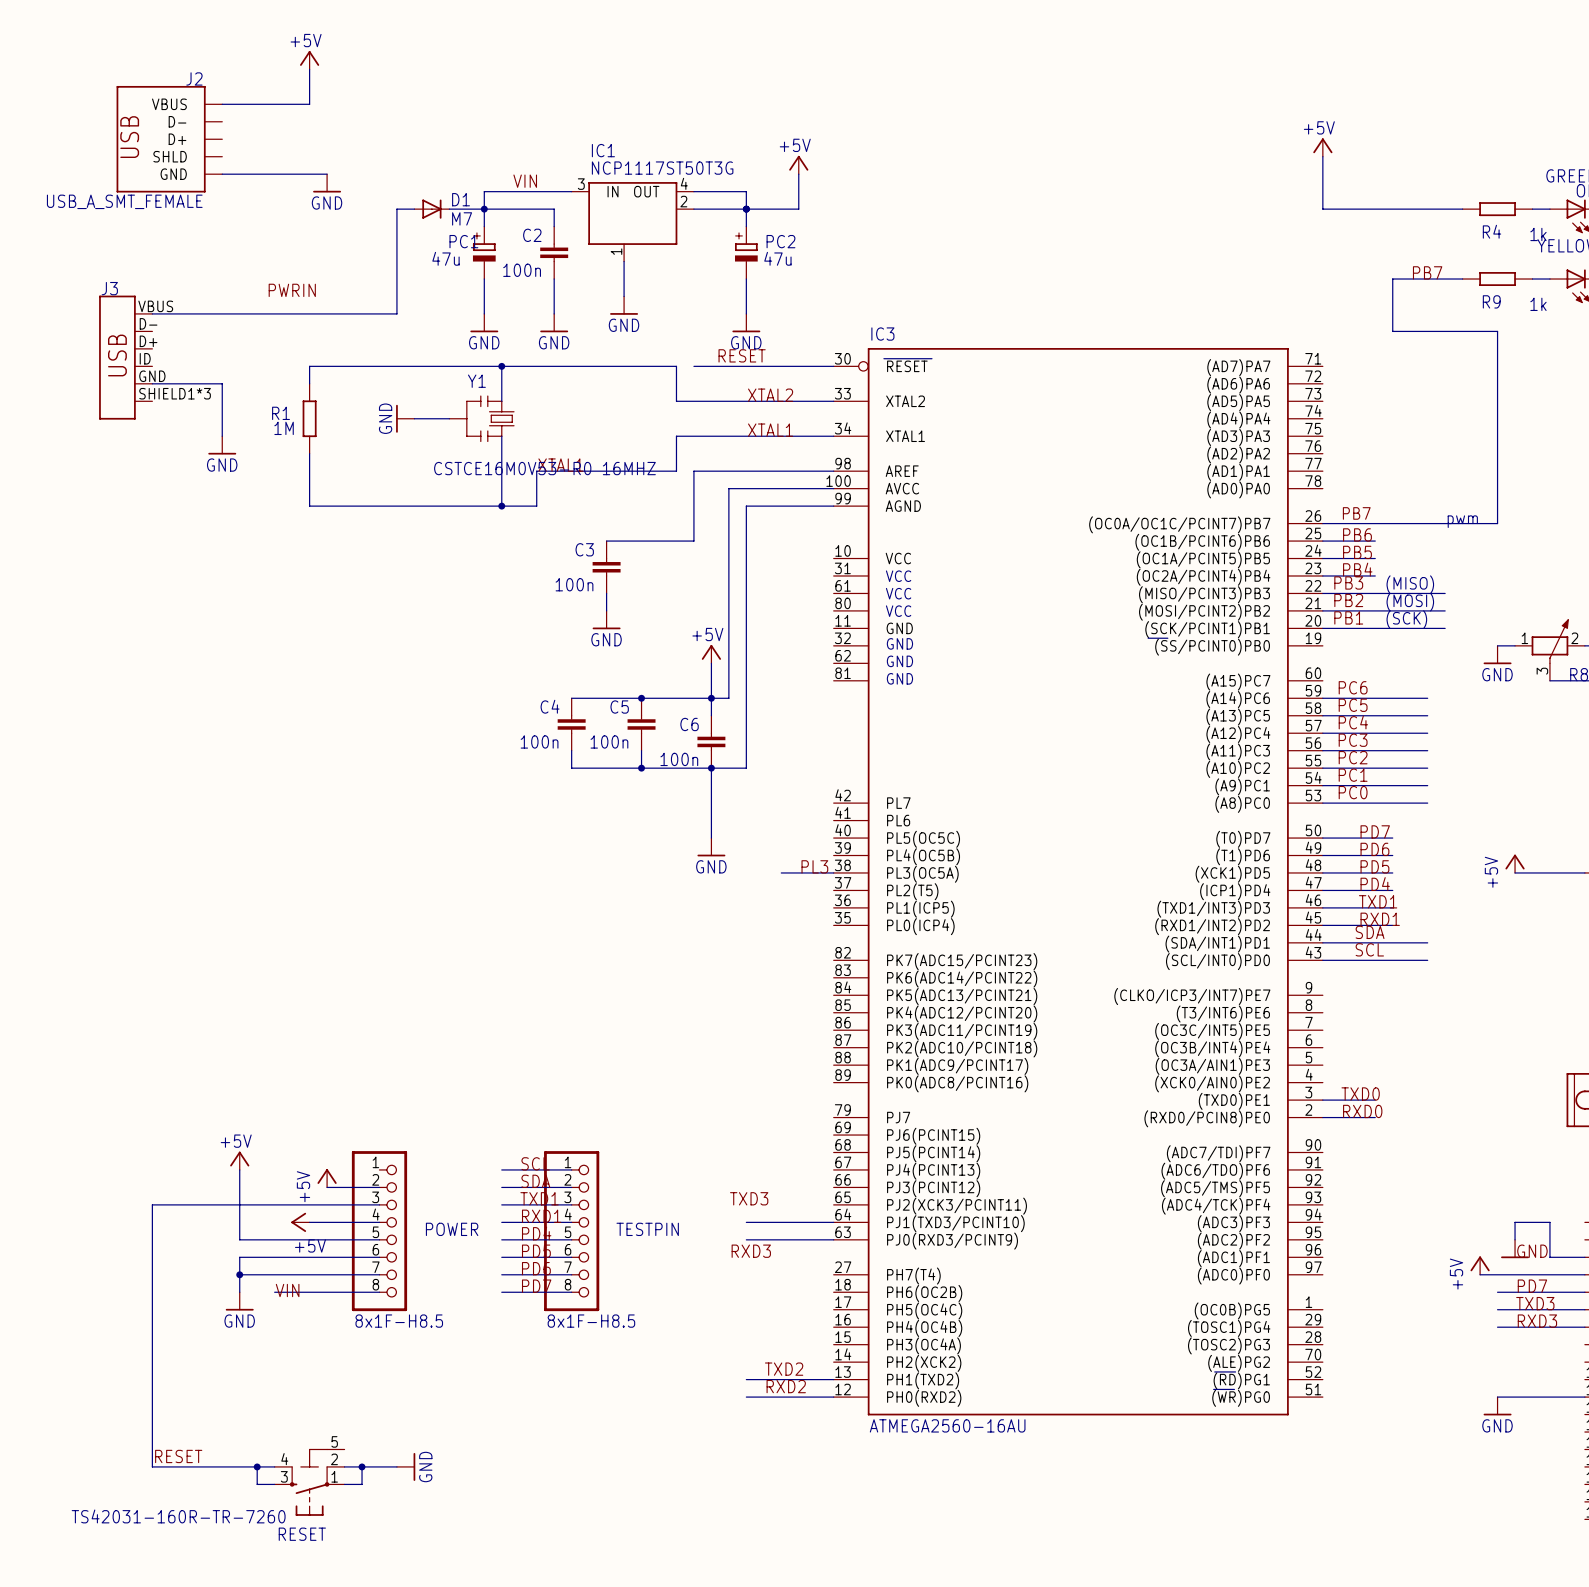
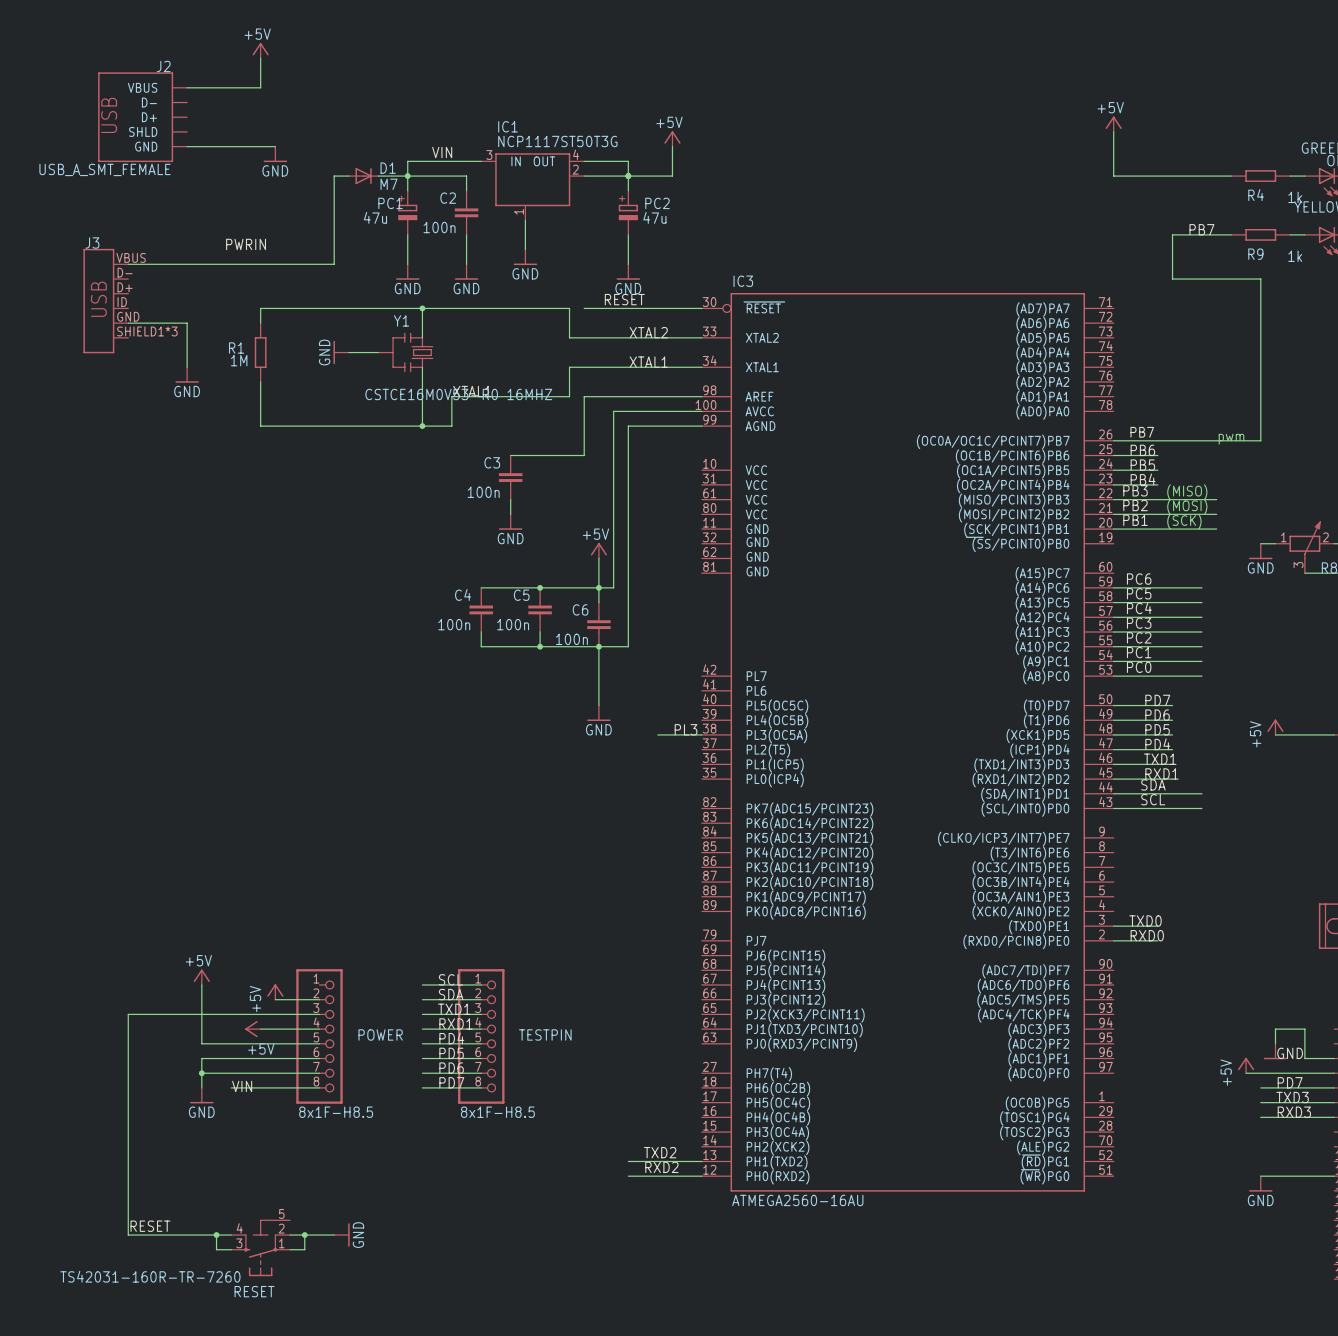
label: TXD3 (749, 1198) -> none
wire: (746, 1222) (833, 1222) -> none
wire: (746, 1239) (833, 1239) -> none
label: RXD3 (751, 1251) -> none

